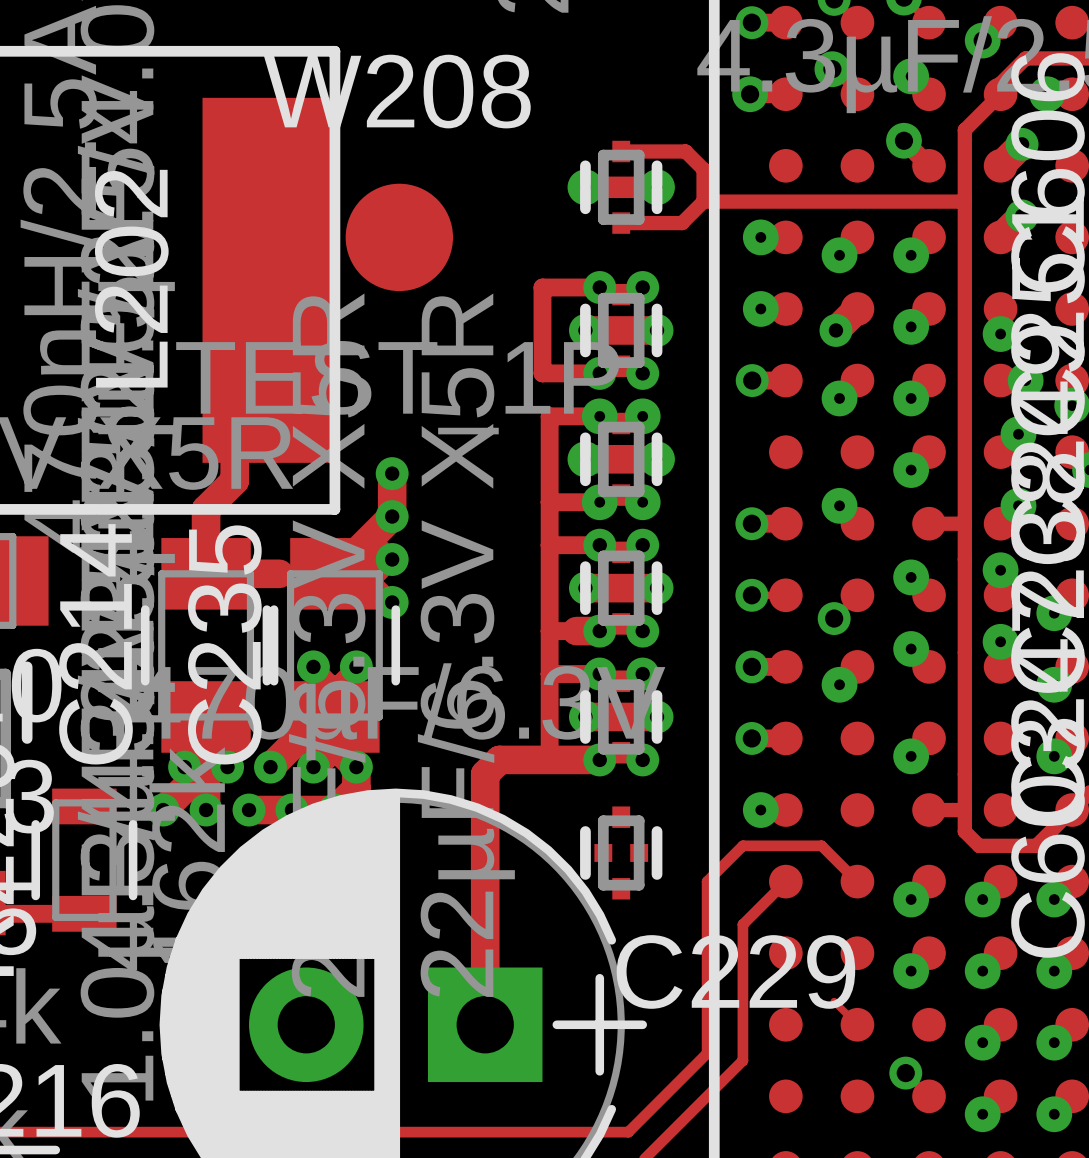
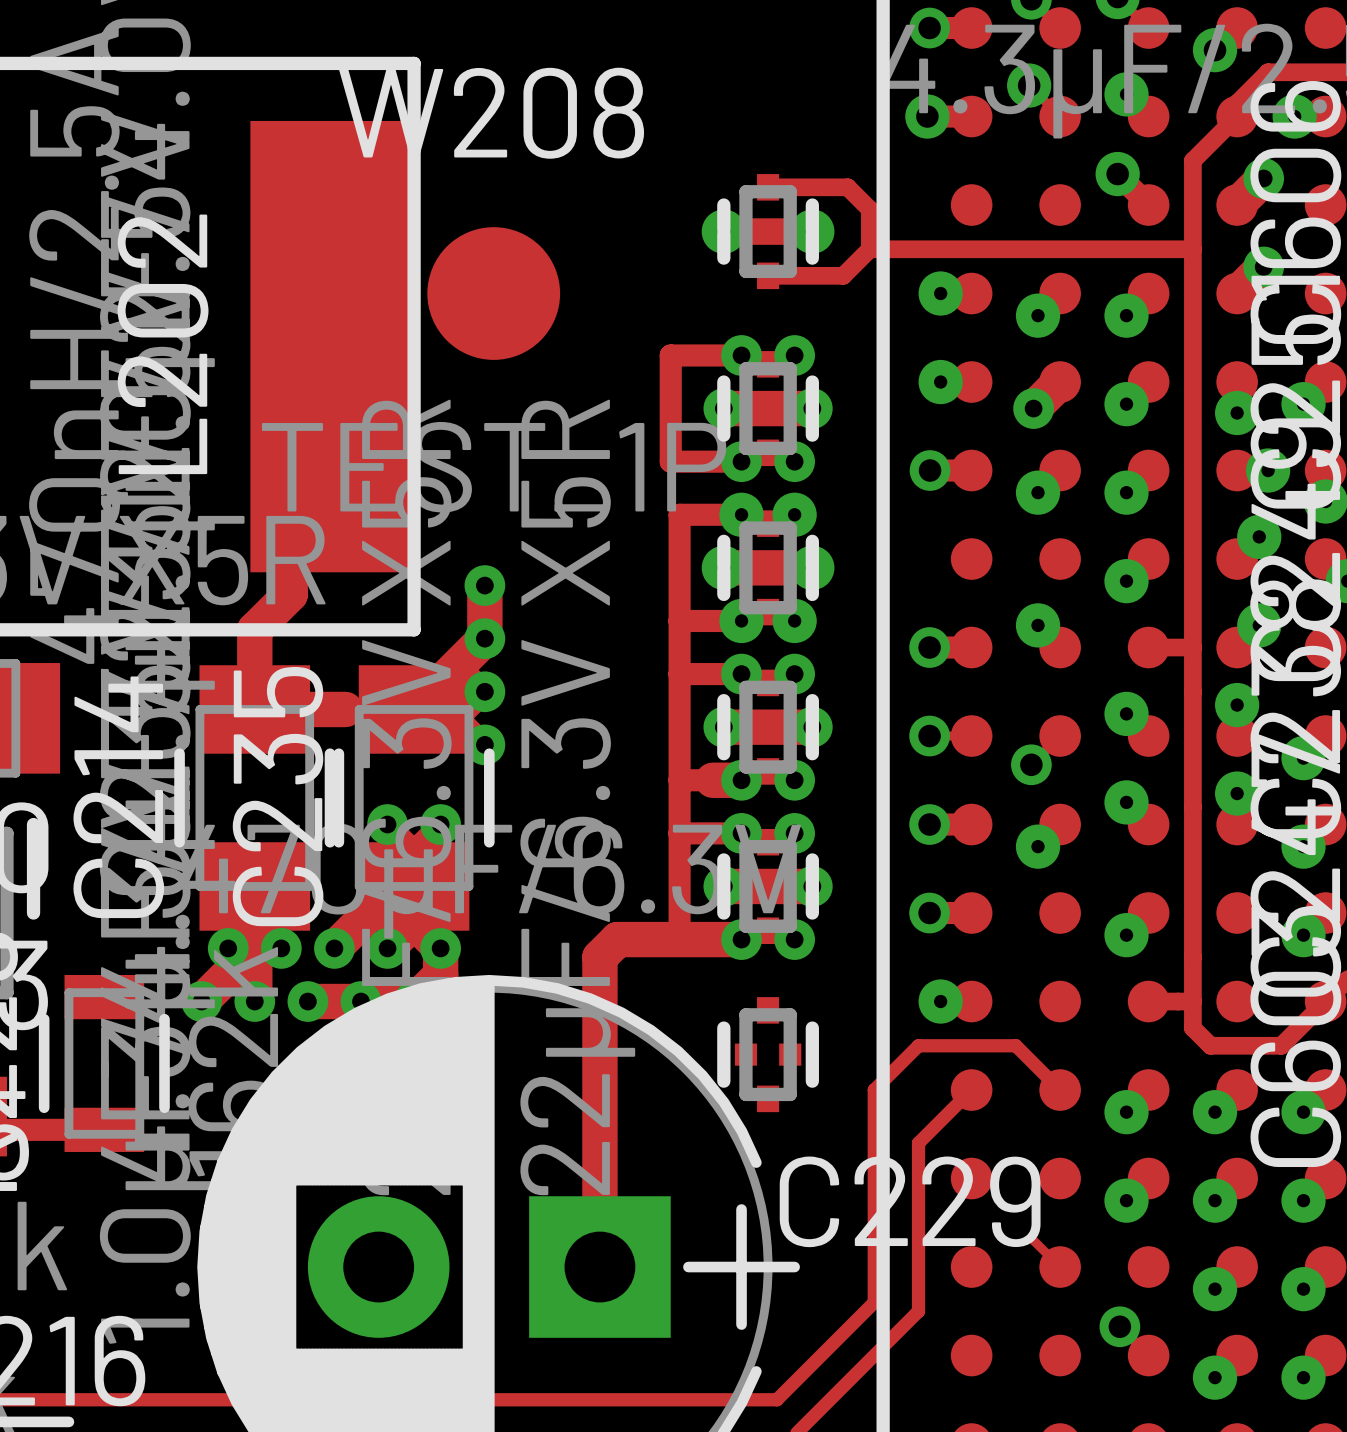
via: none -> (1303, 404)

